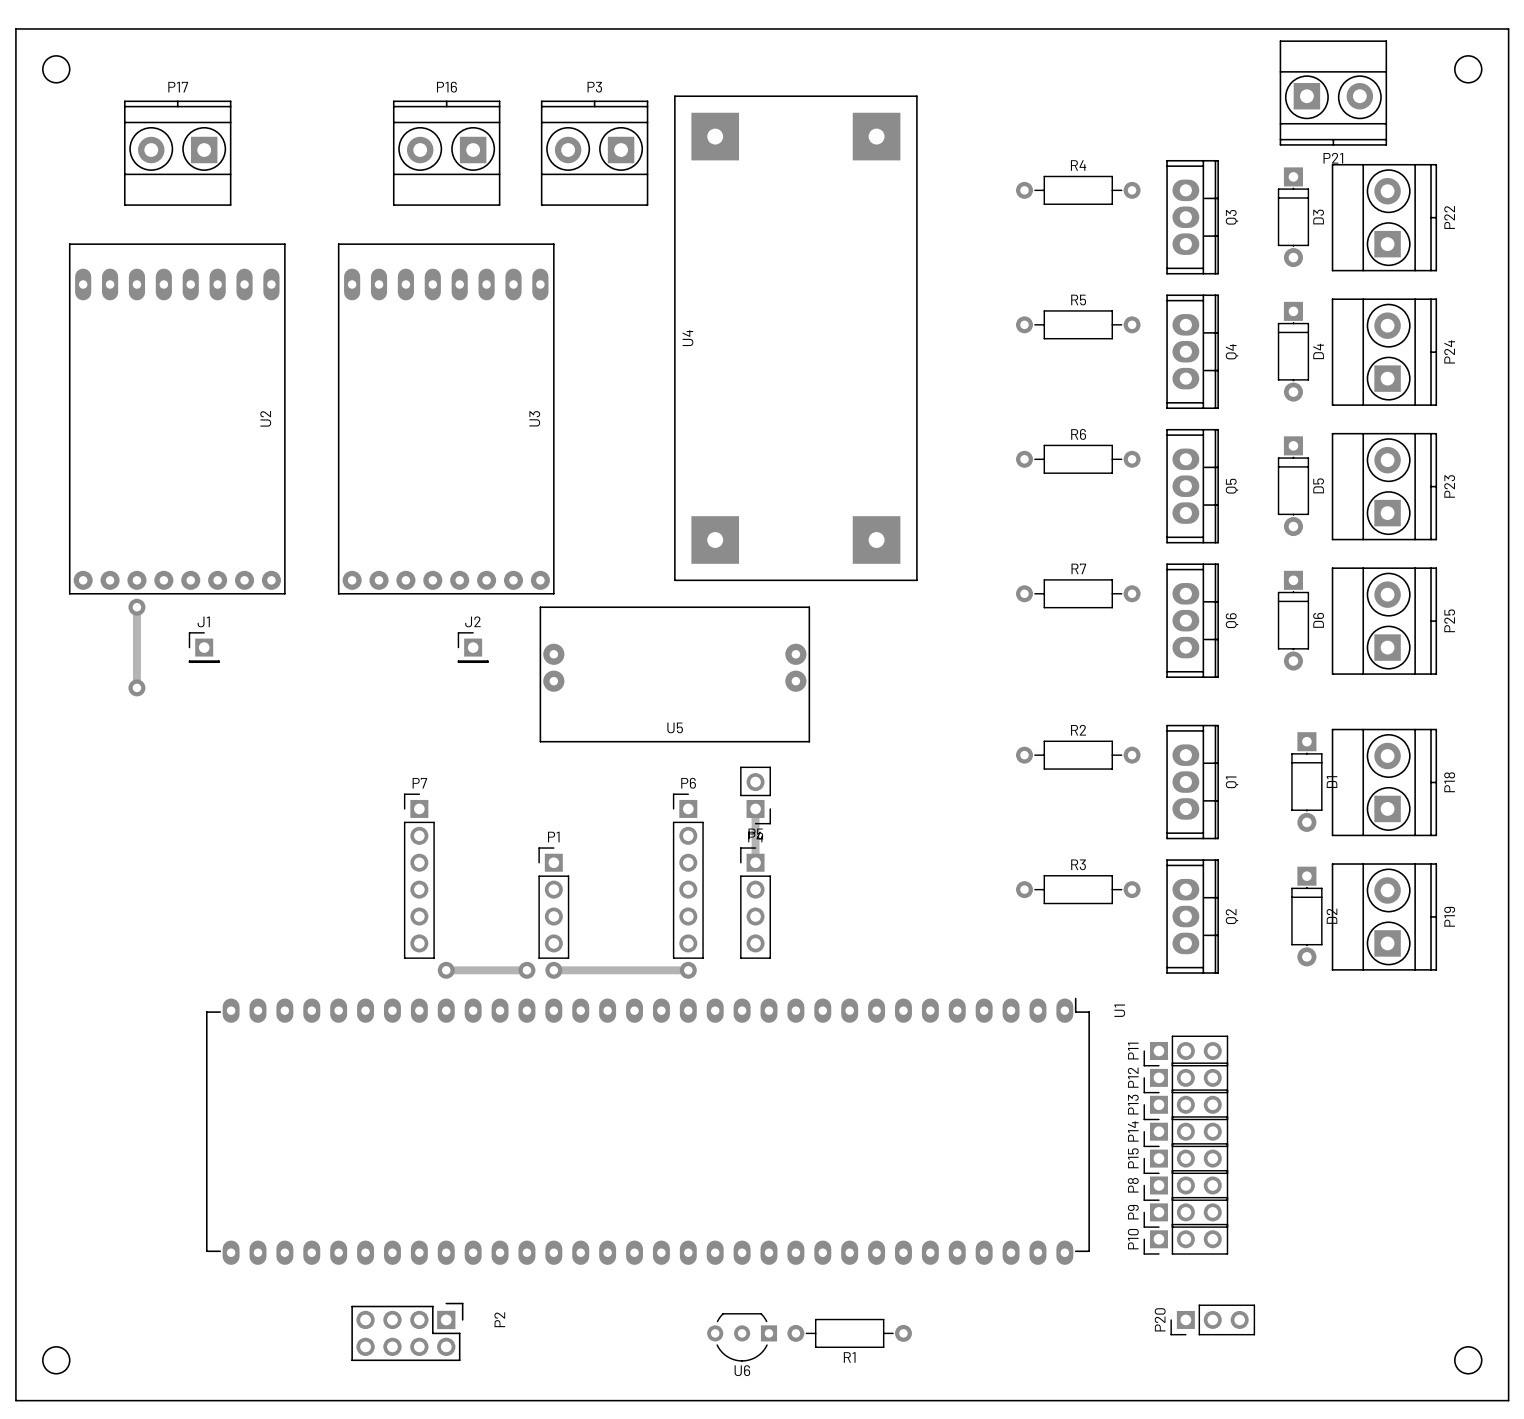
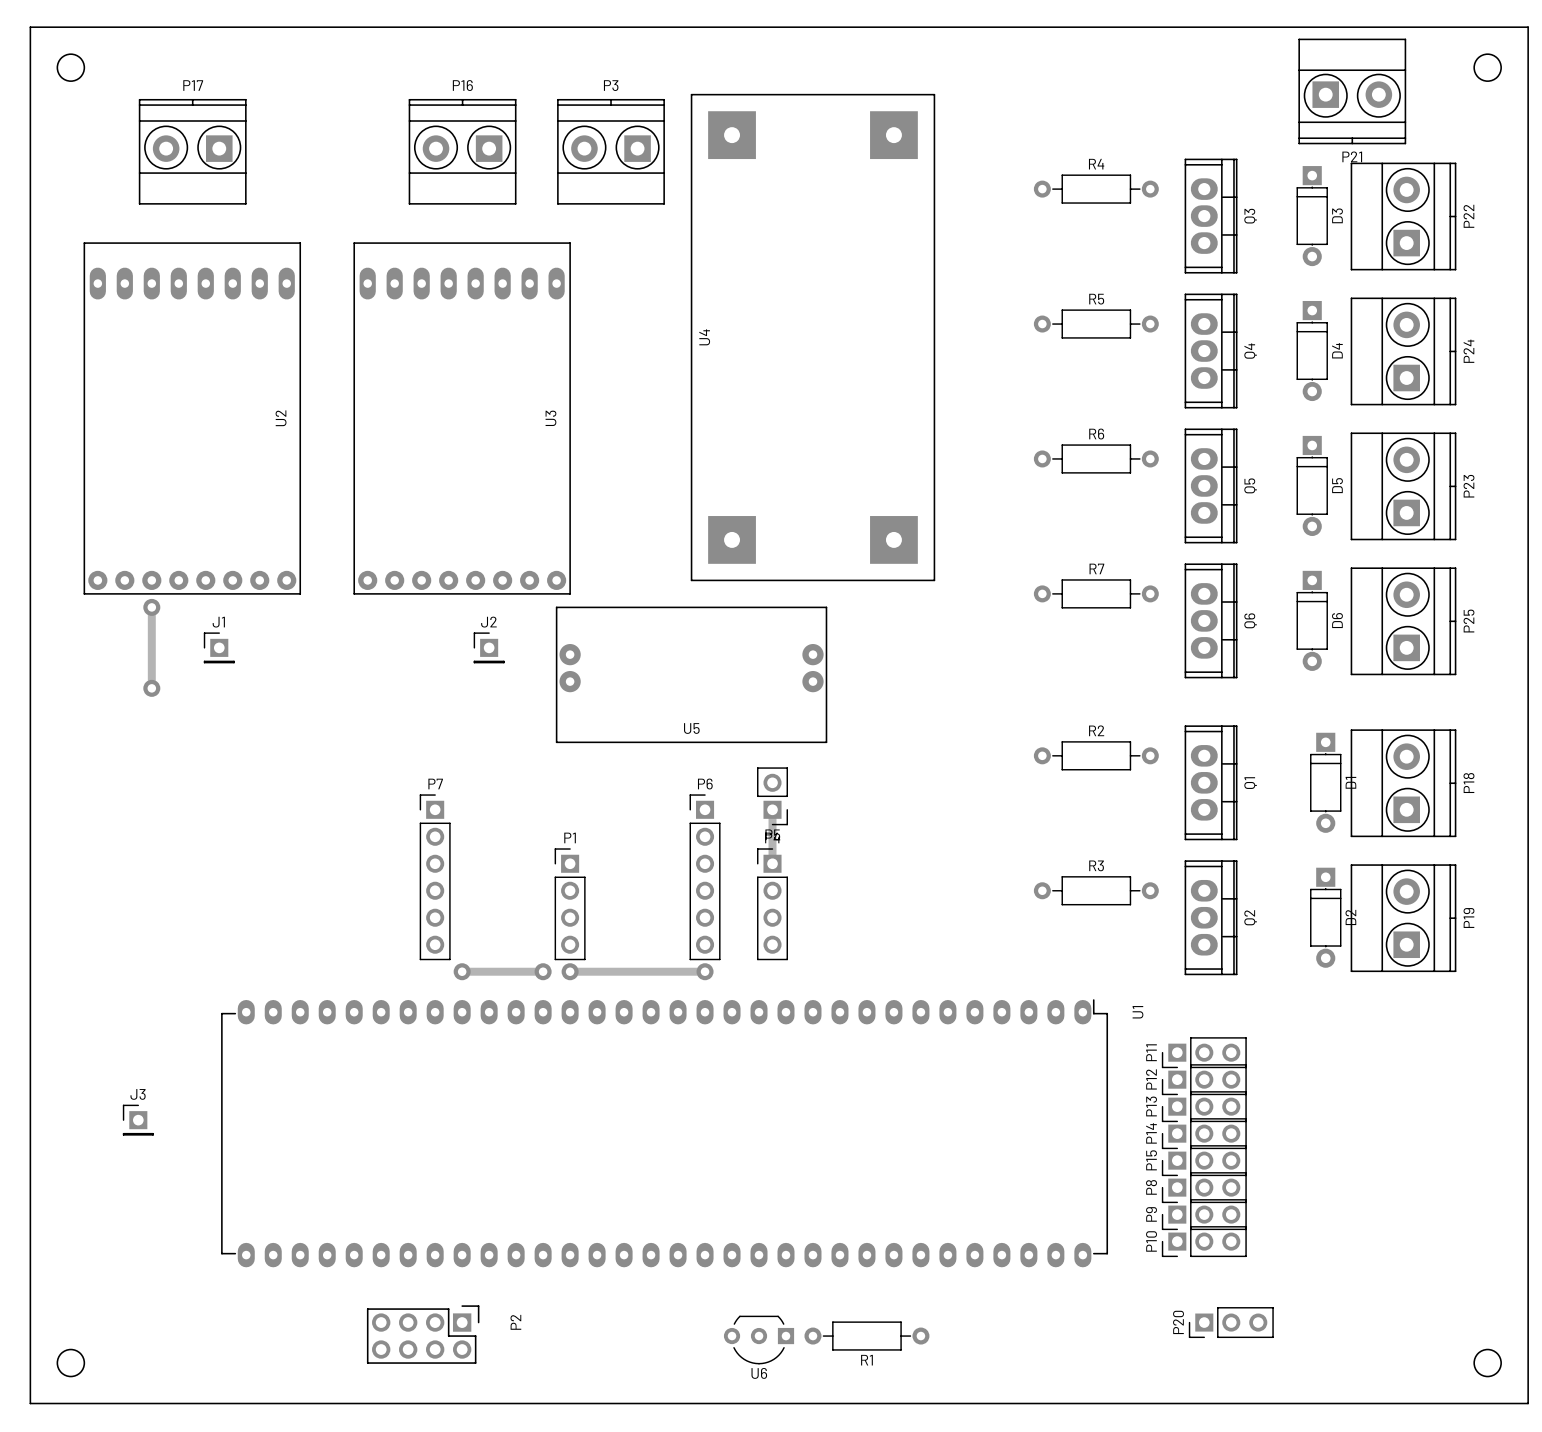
J3: none -> (138, 1120)

